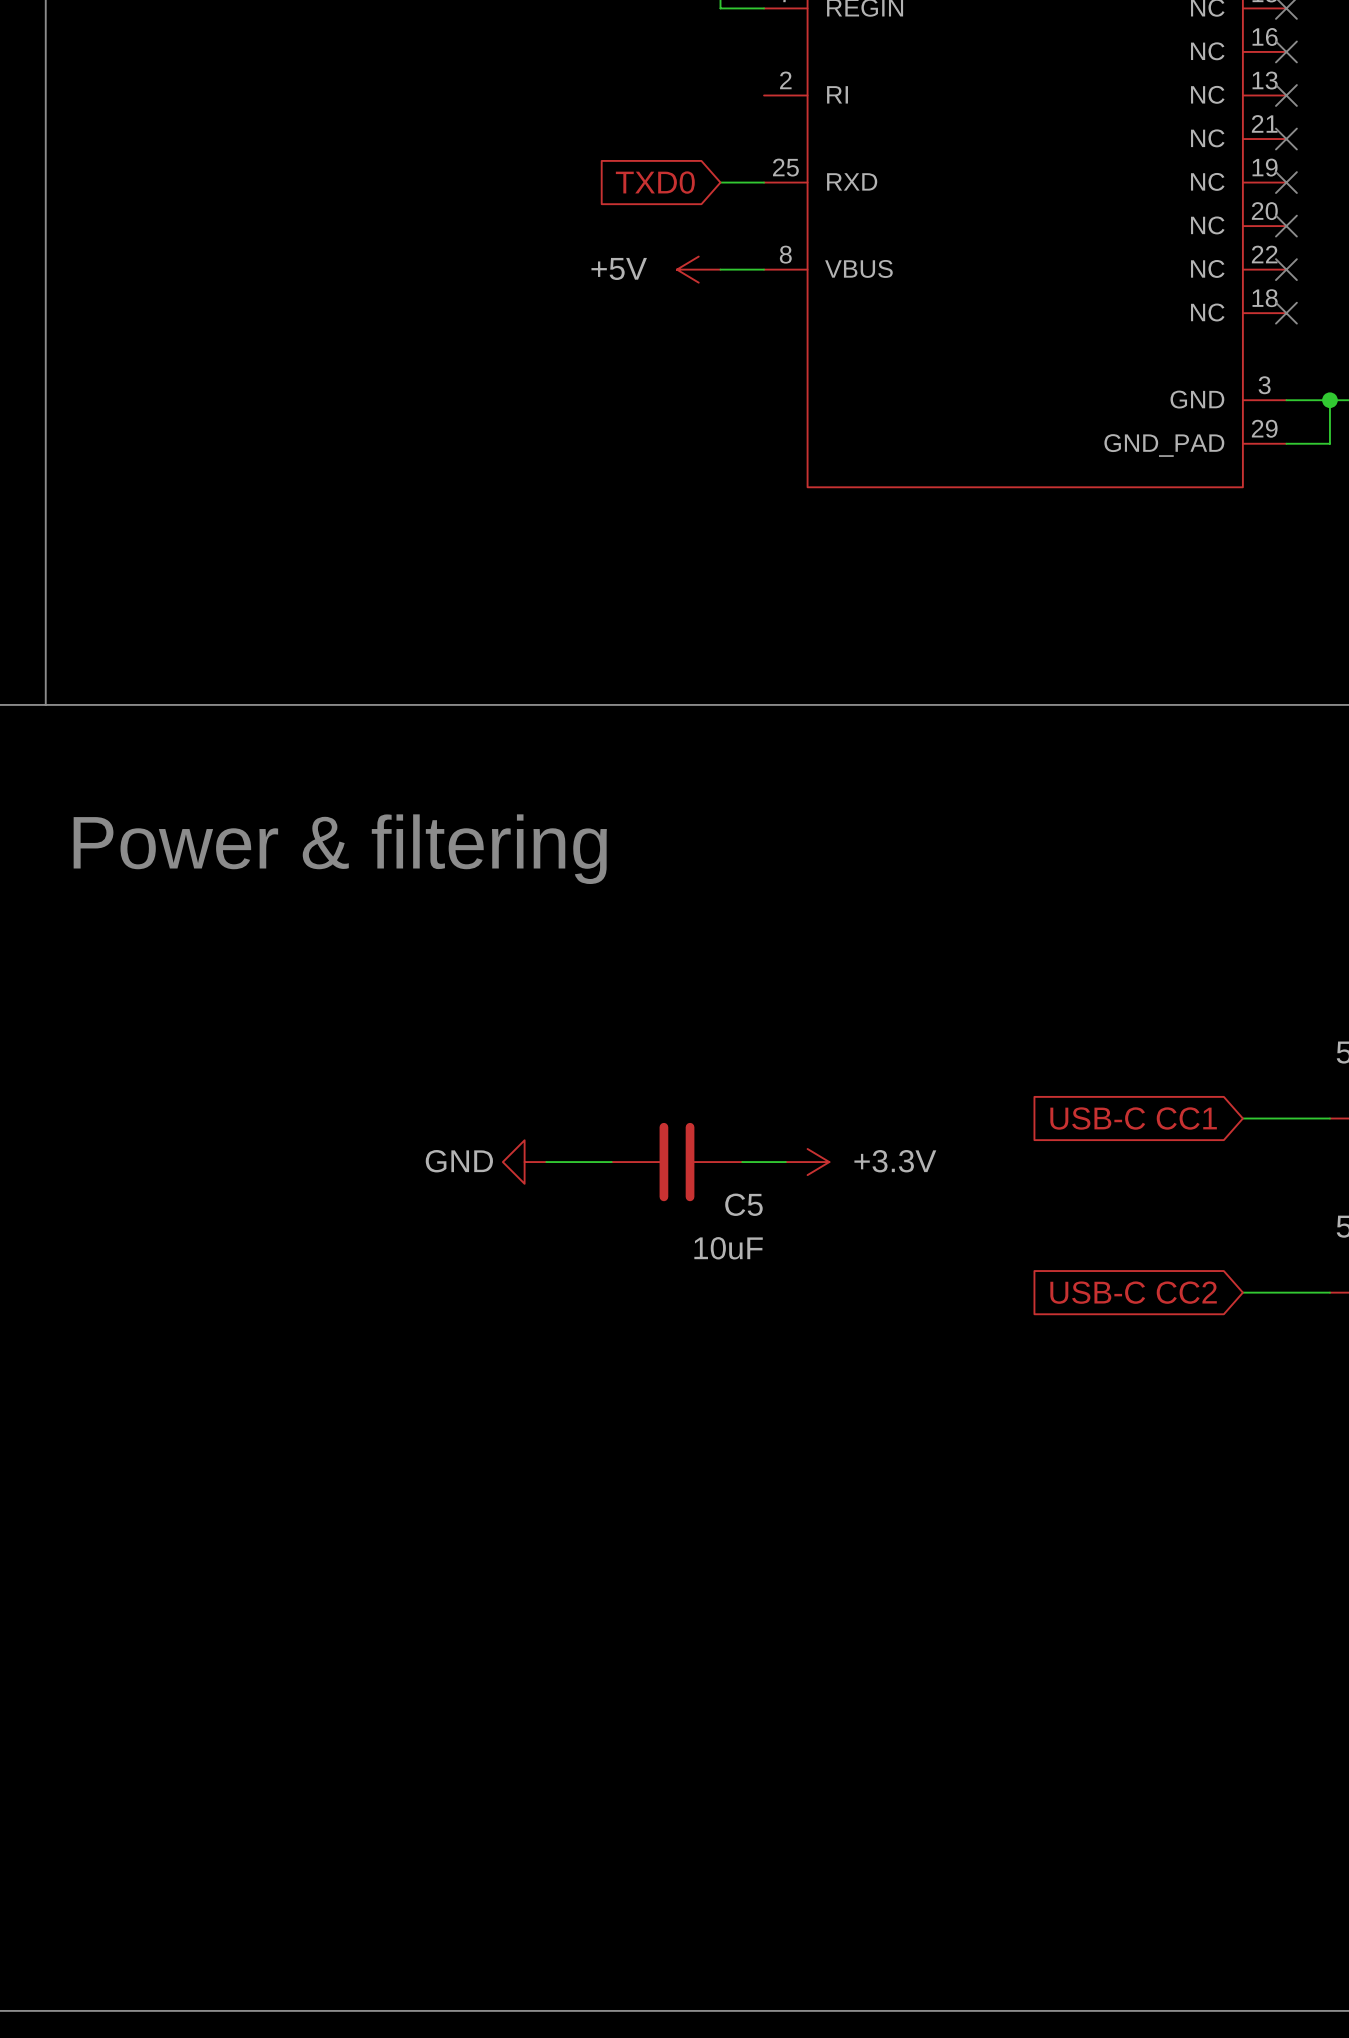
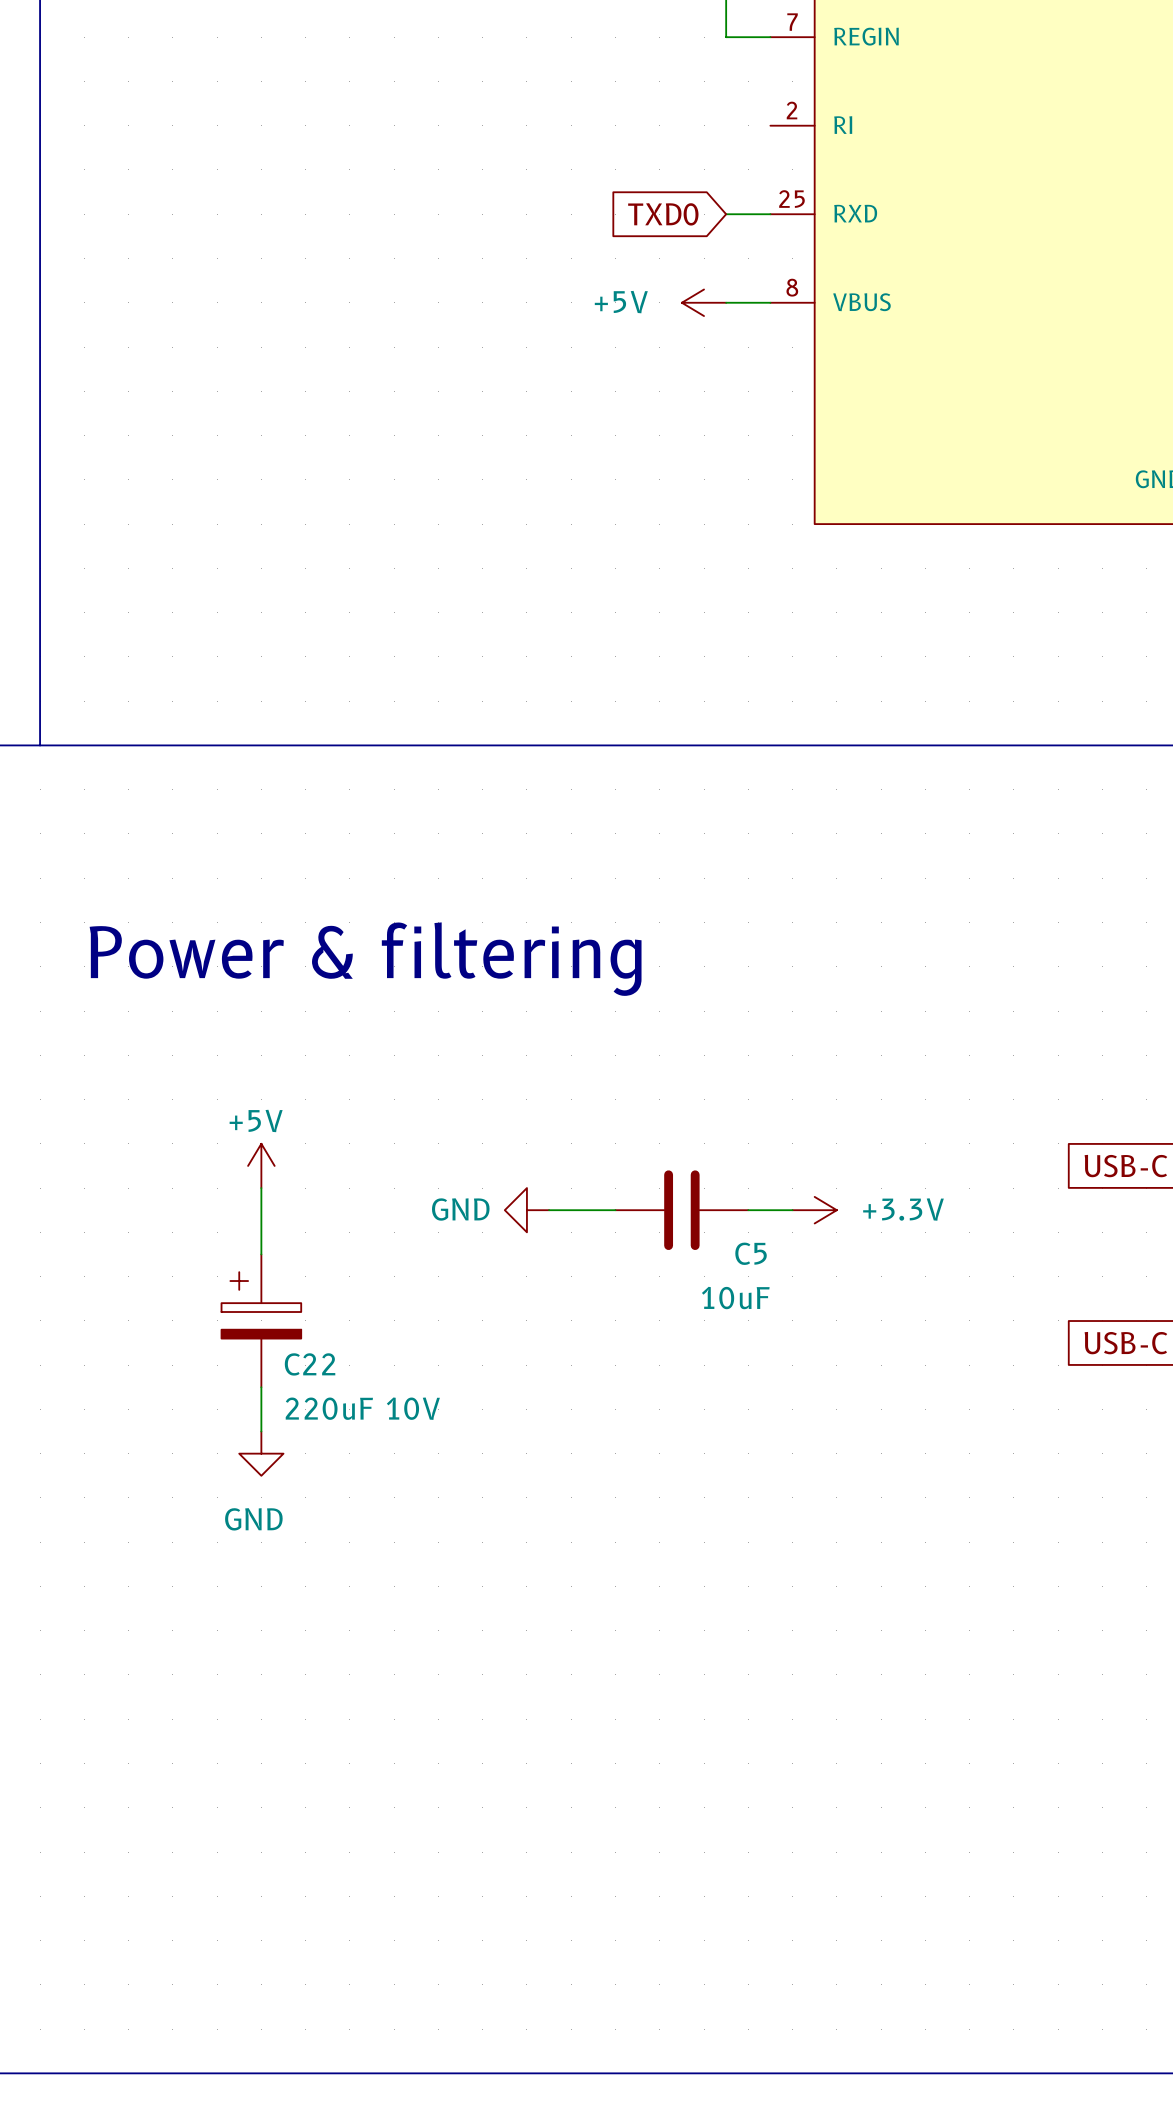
text position: Power & filtering (340, 849) -> Power & filtering (365, 959)
power symbol: none -> +5V (261, 1165)
wire: none -> (261, 1188) (261, 1254)
C22: none -> 220uF 10V (261, 1320)
wire: none -> (261, 1387) (261, 1431)
power symbol: none -> GND (261, 1453)

